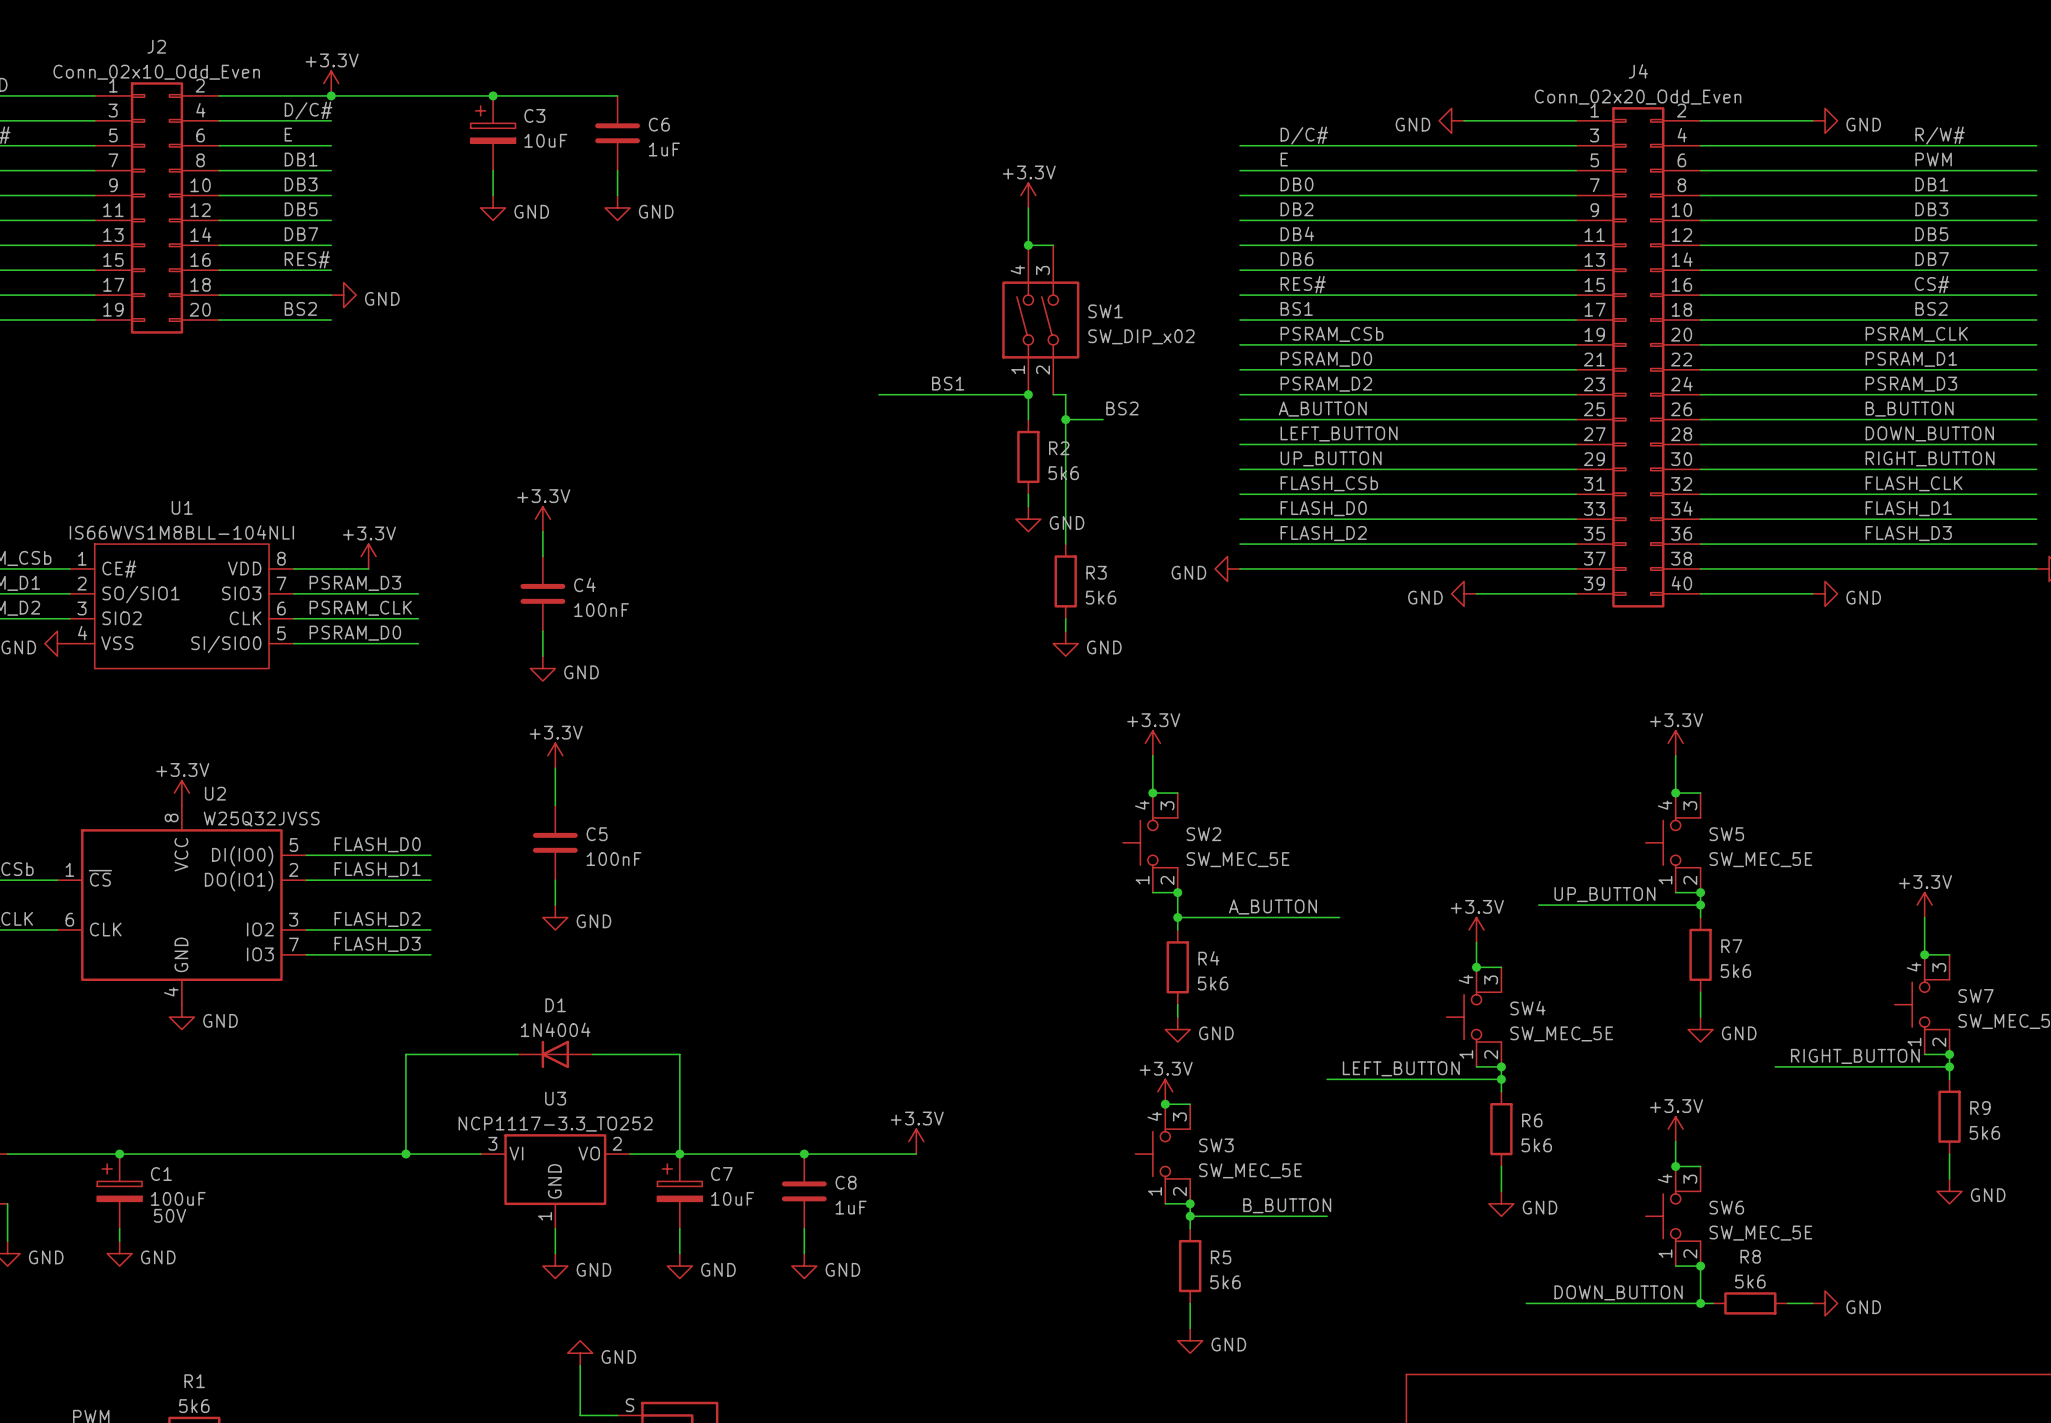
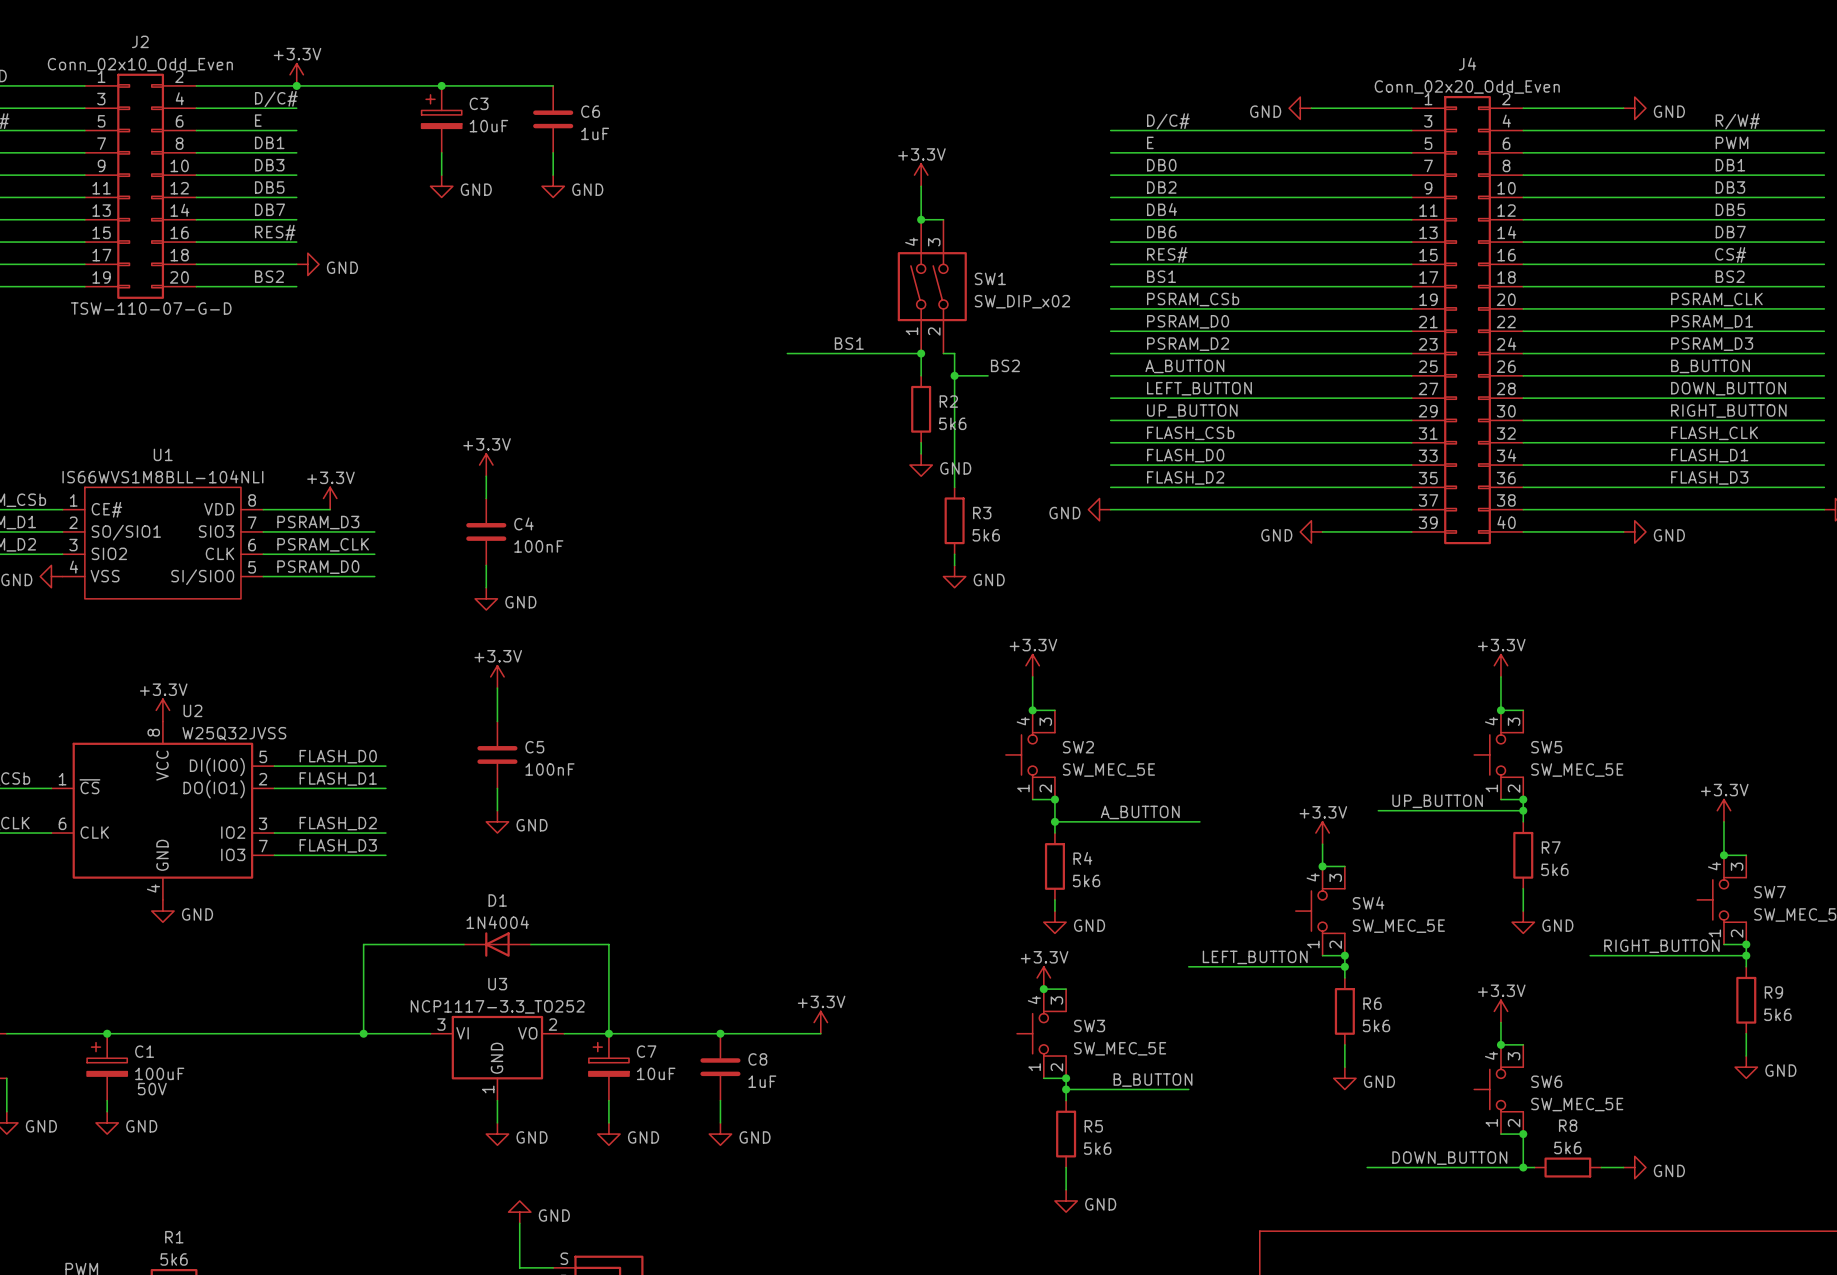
J2 text: none -> TSW-110-07-G-D (151, 308)

